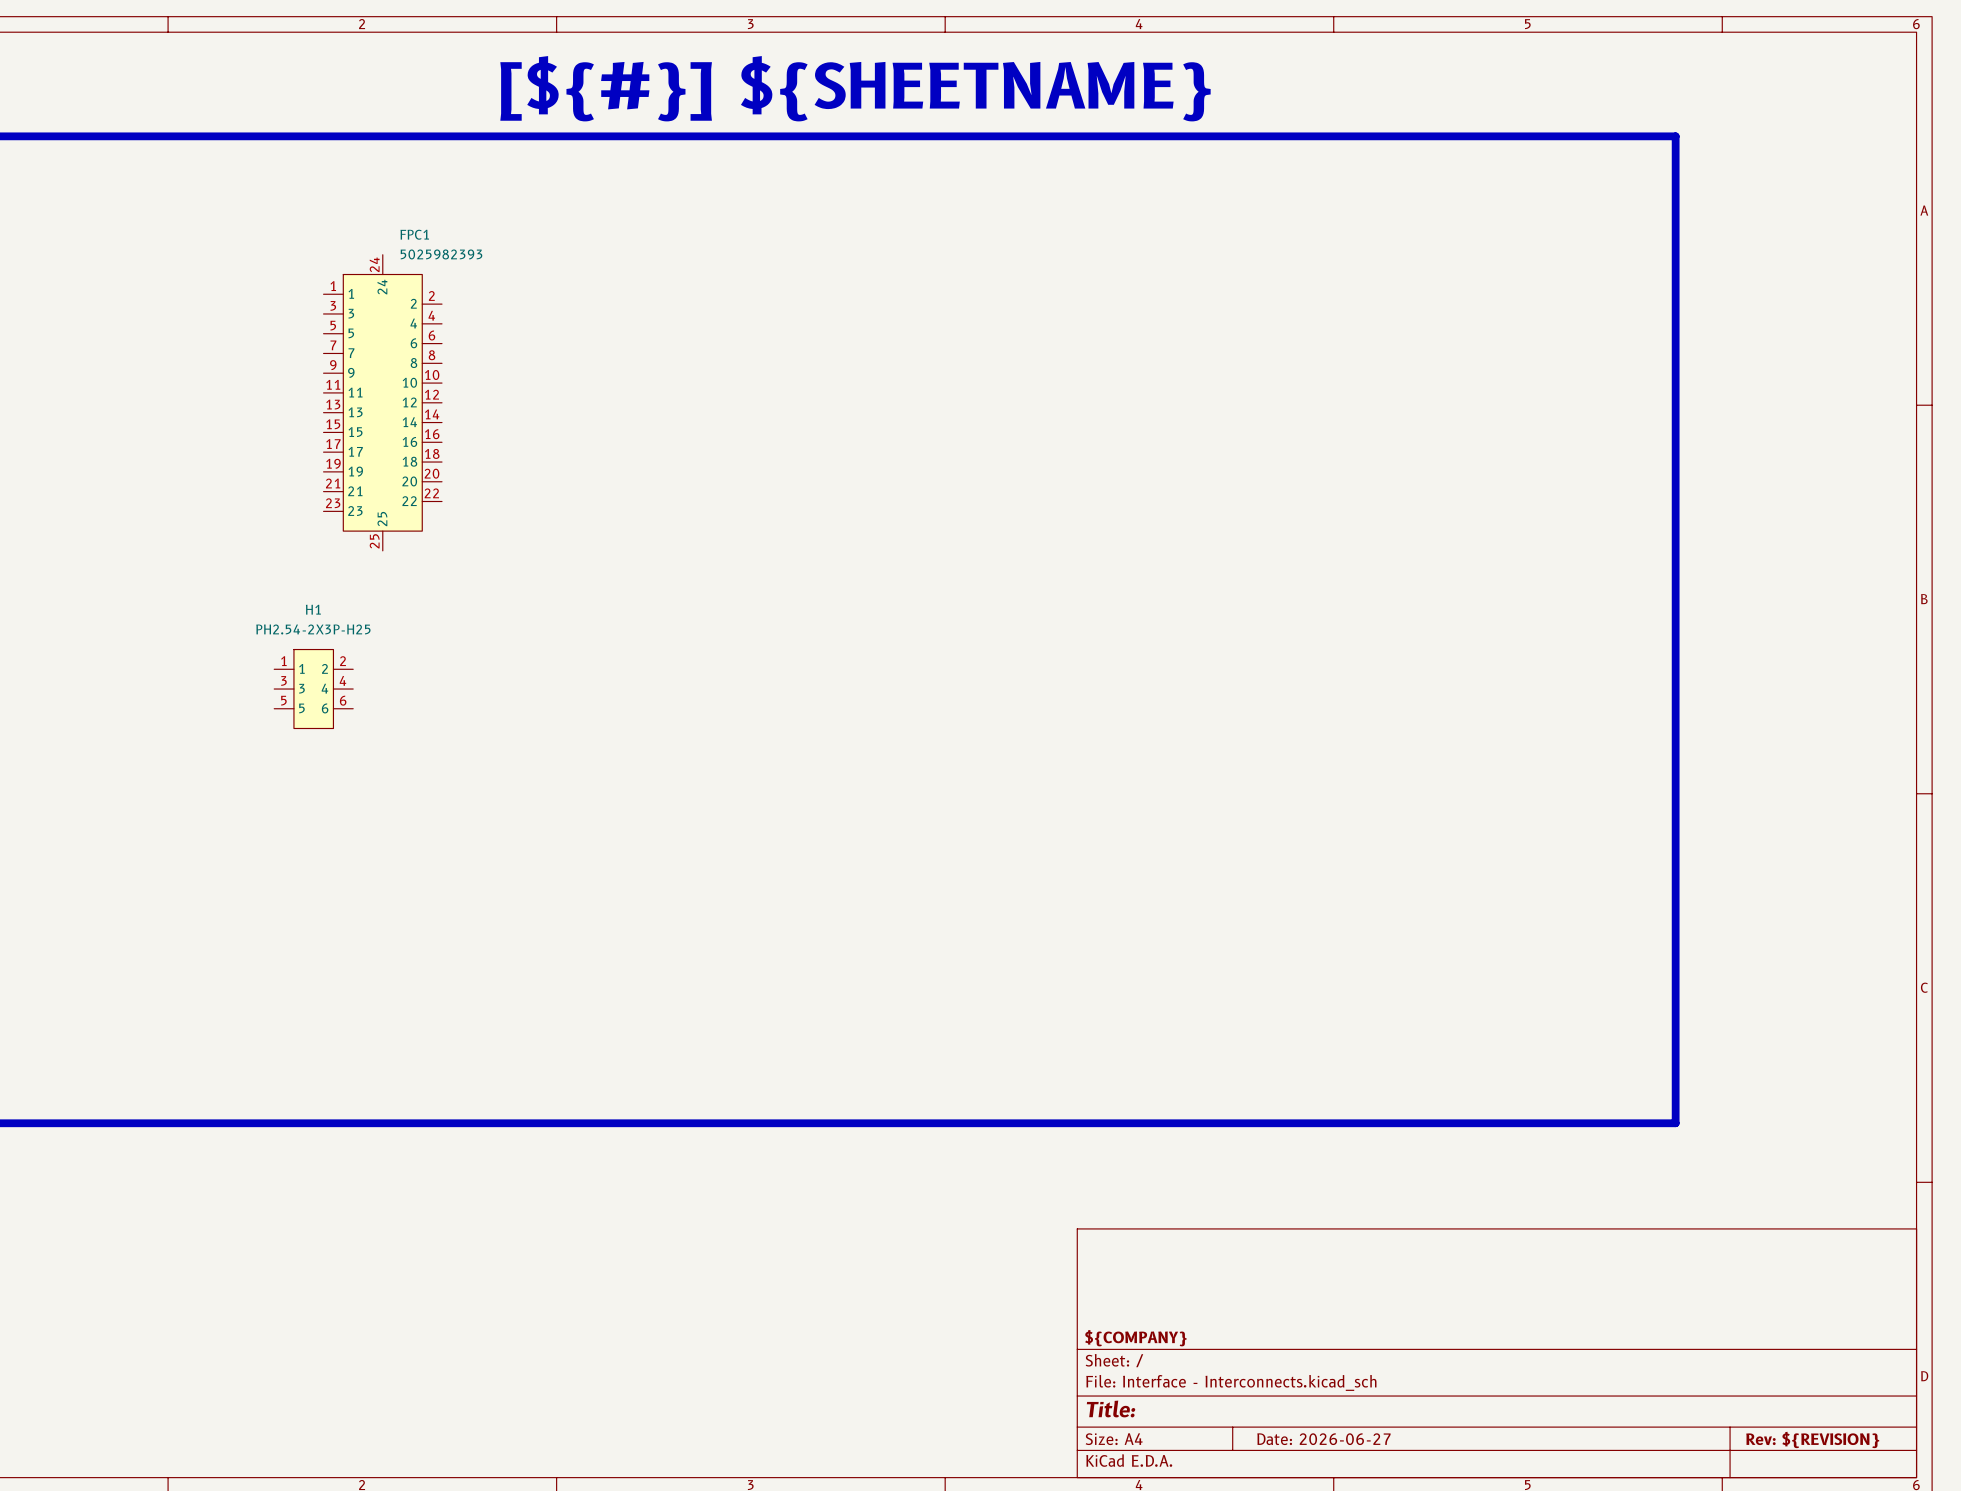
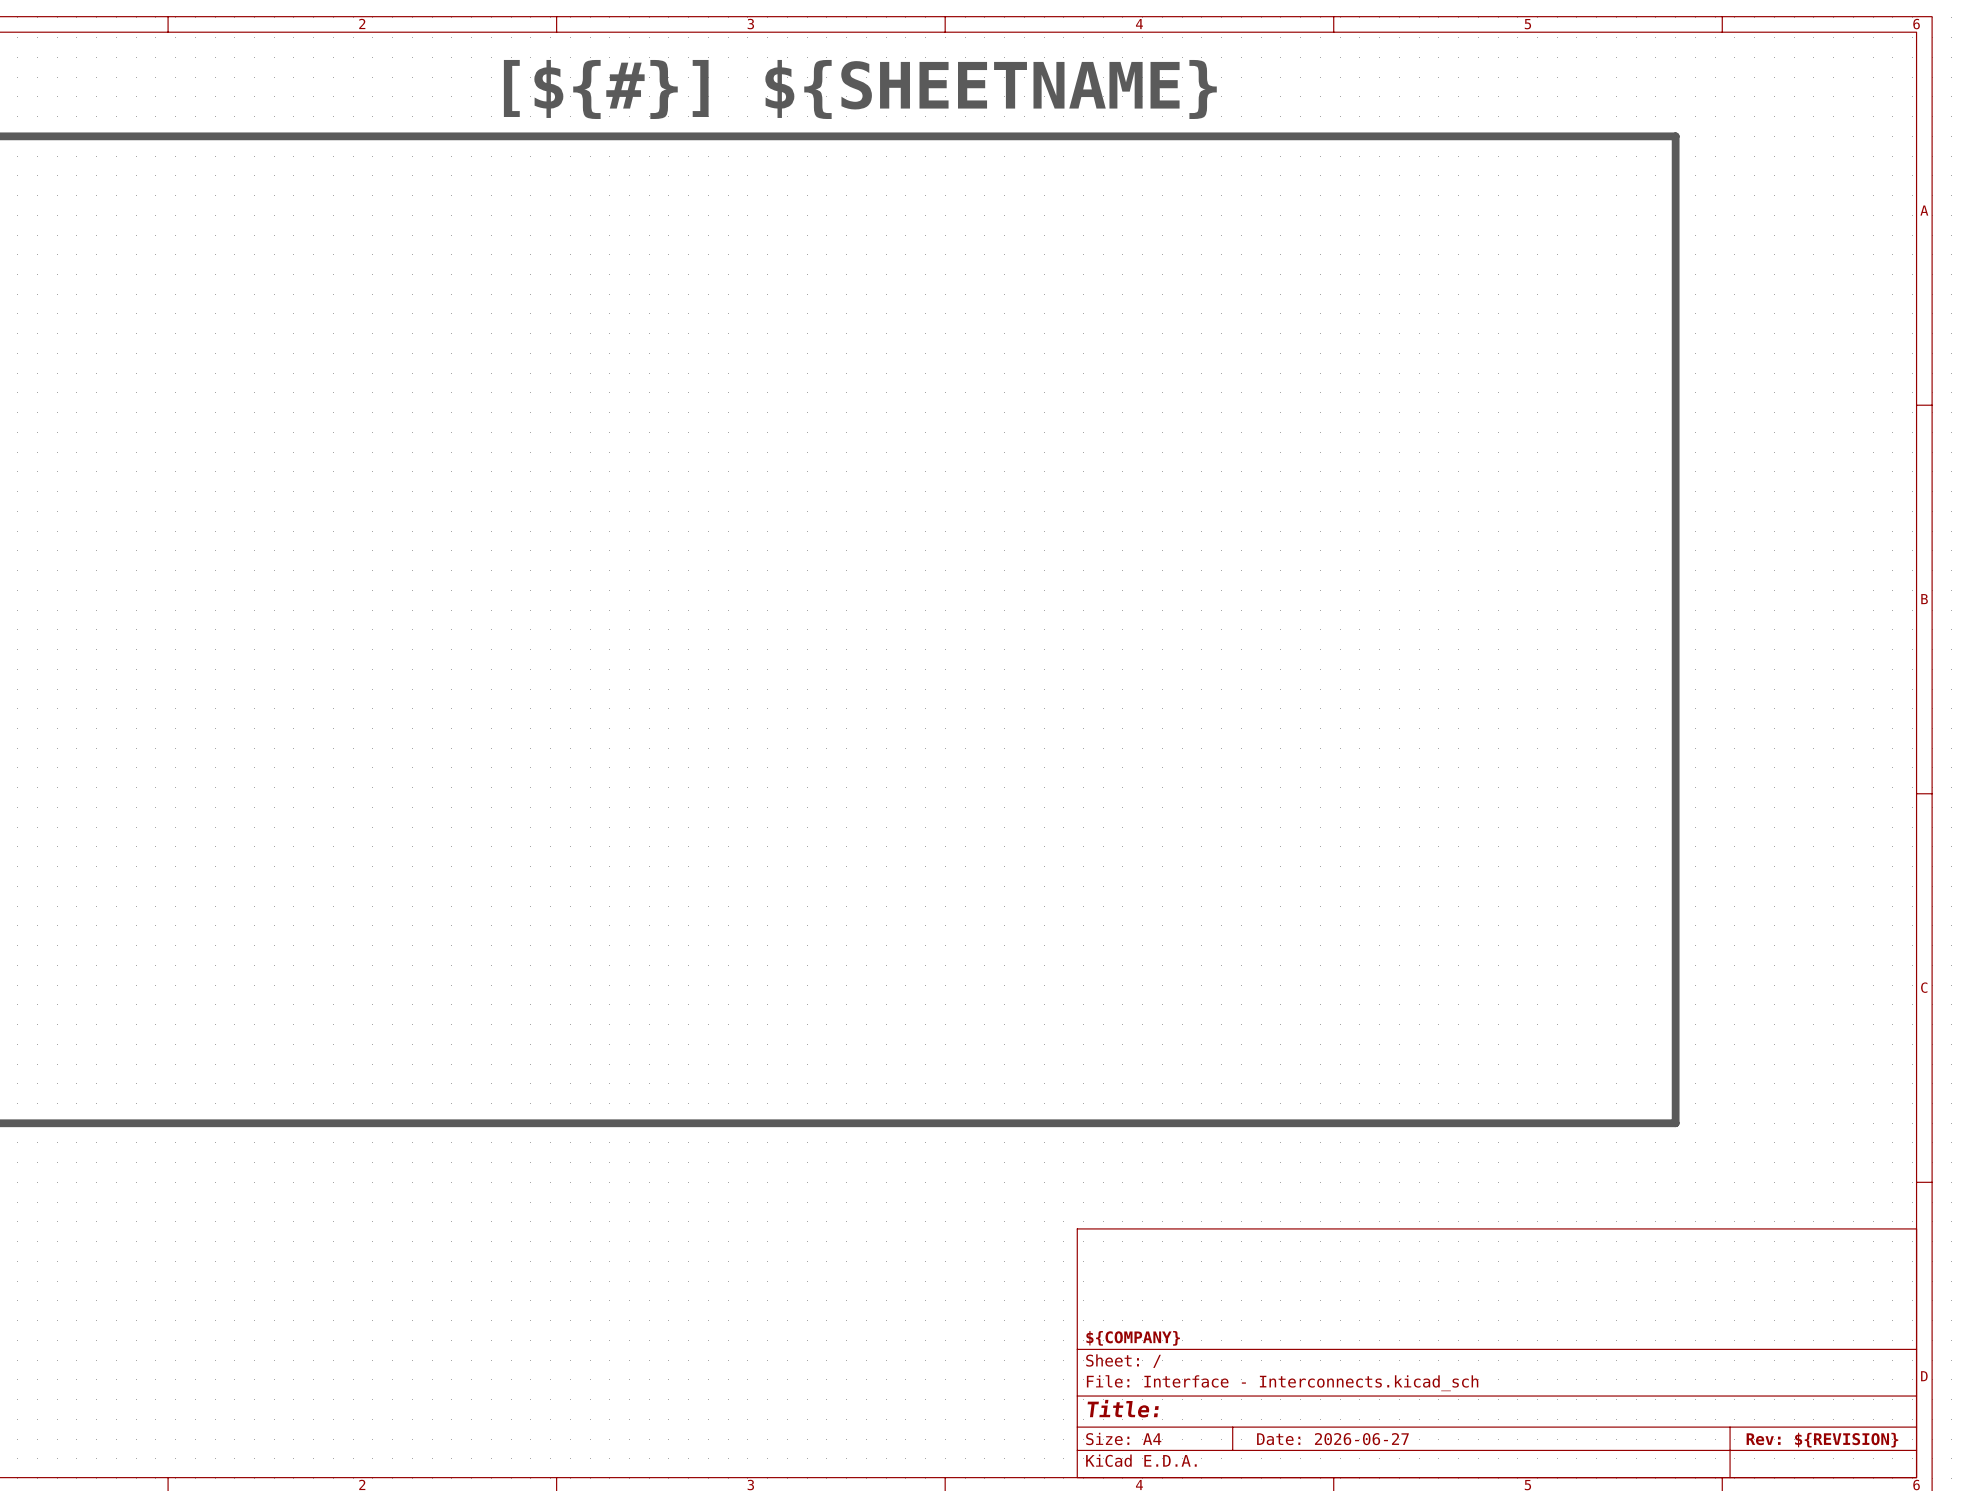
FPC1: 5025982393 (382, 402) -> none
H1: PH2.54-2X3P-H25 (313, 689) -> none

